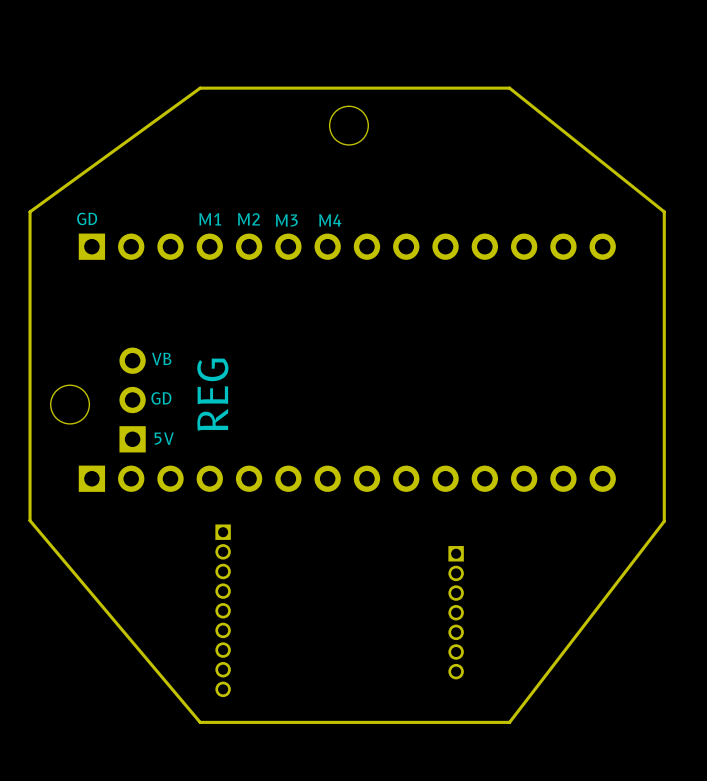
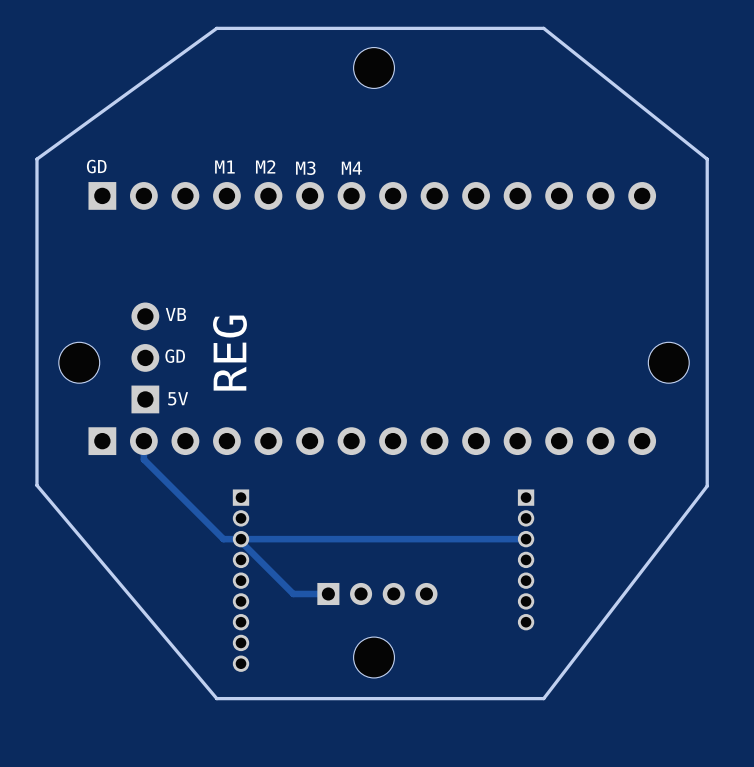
part: none -> (668, 362)
track: none -> (143, 441) (143, 459) (223, 539) (526, 539)
track: none -> (238, 539) (293, 593) (328, 593)
part position: (456, 612) -> (526, 559)
part: none -> (377, 593)
part: none -> (374, 657)

